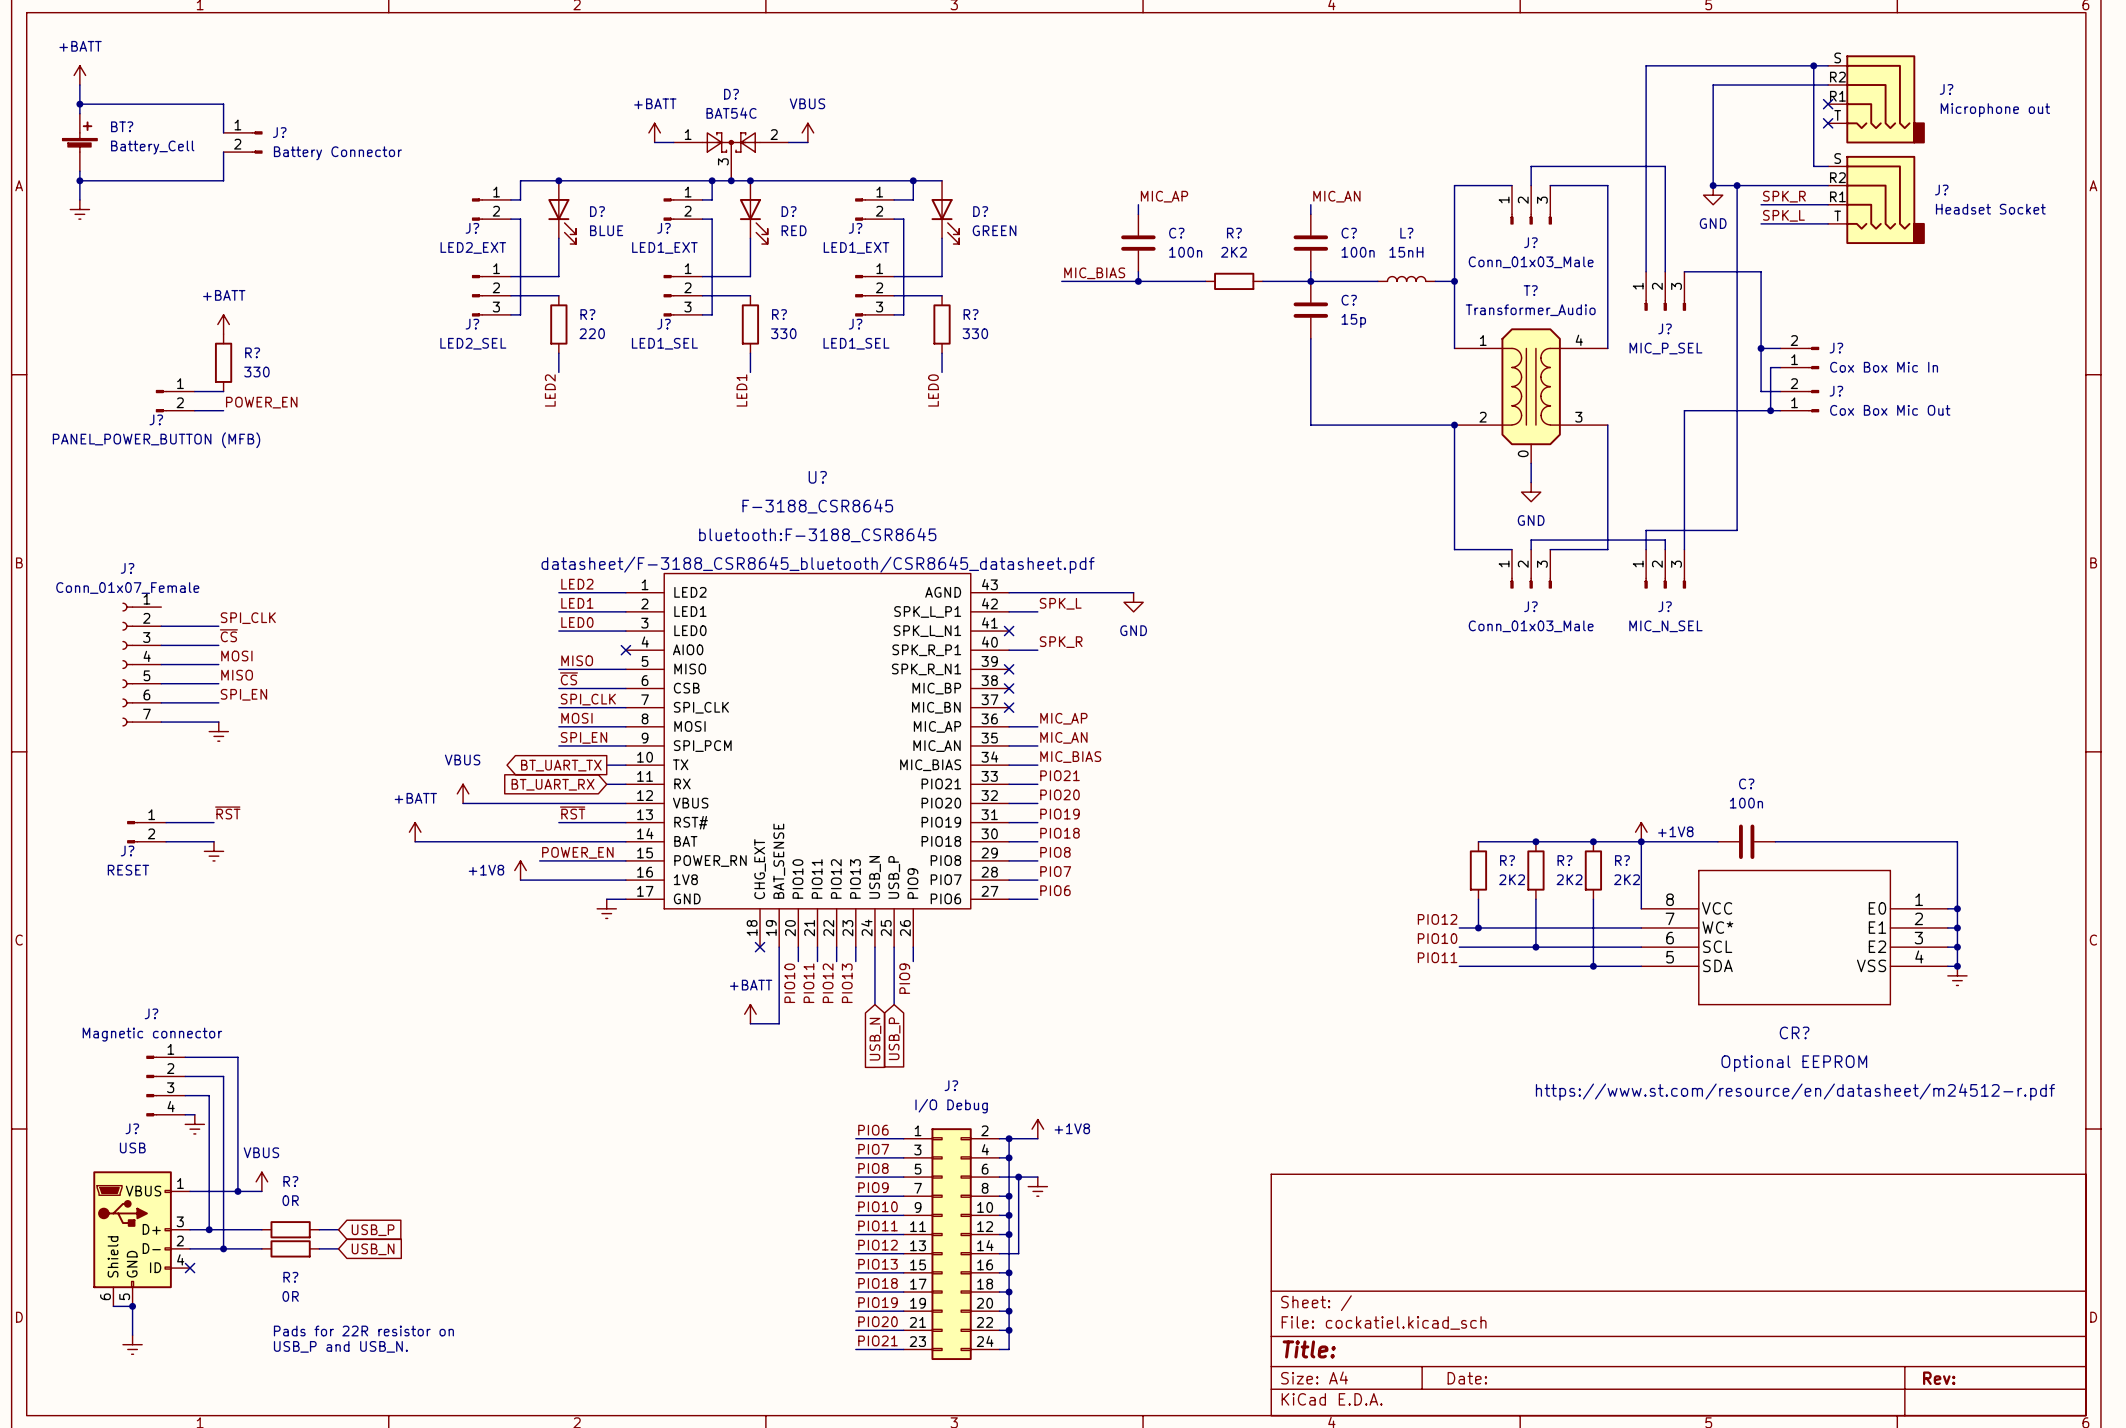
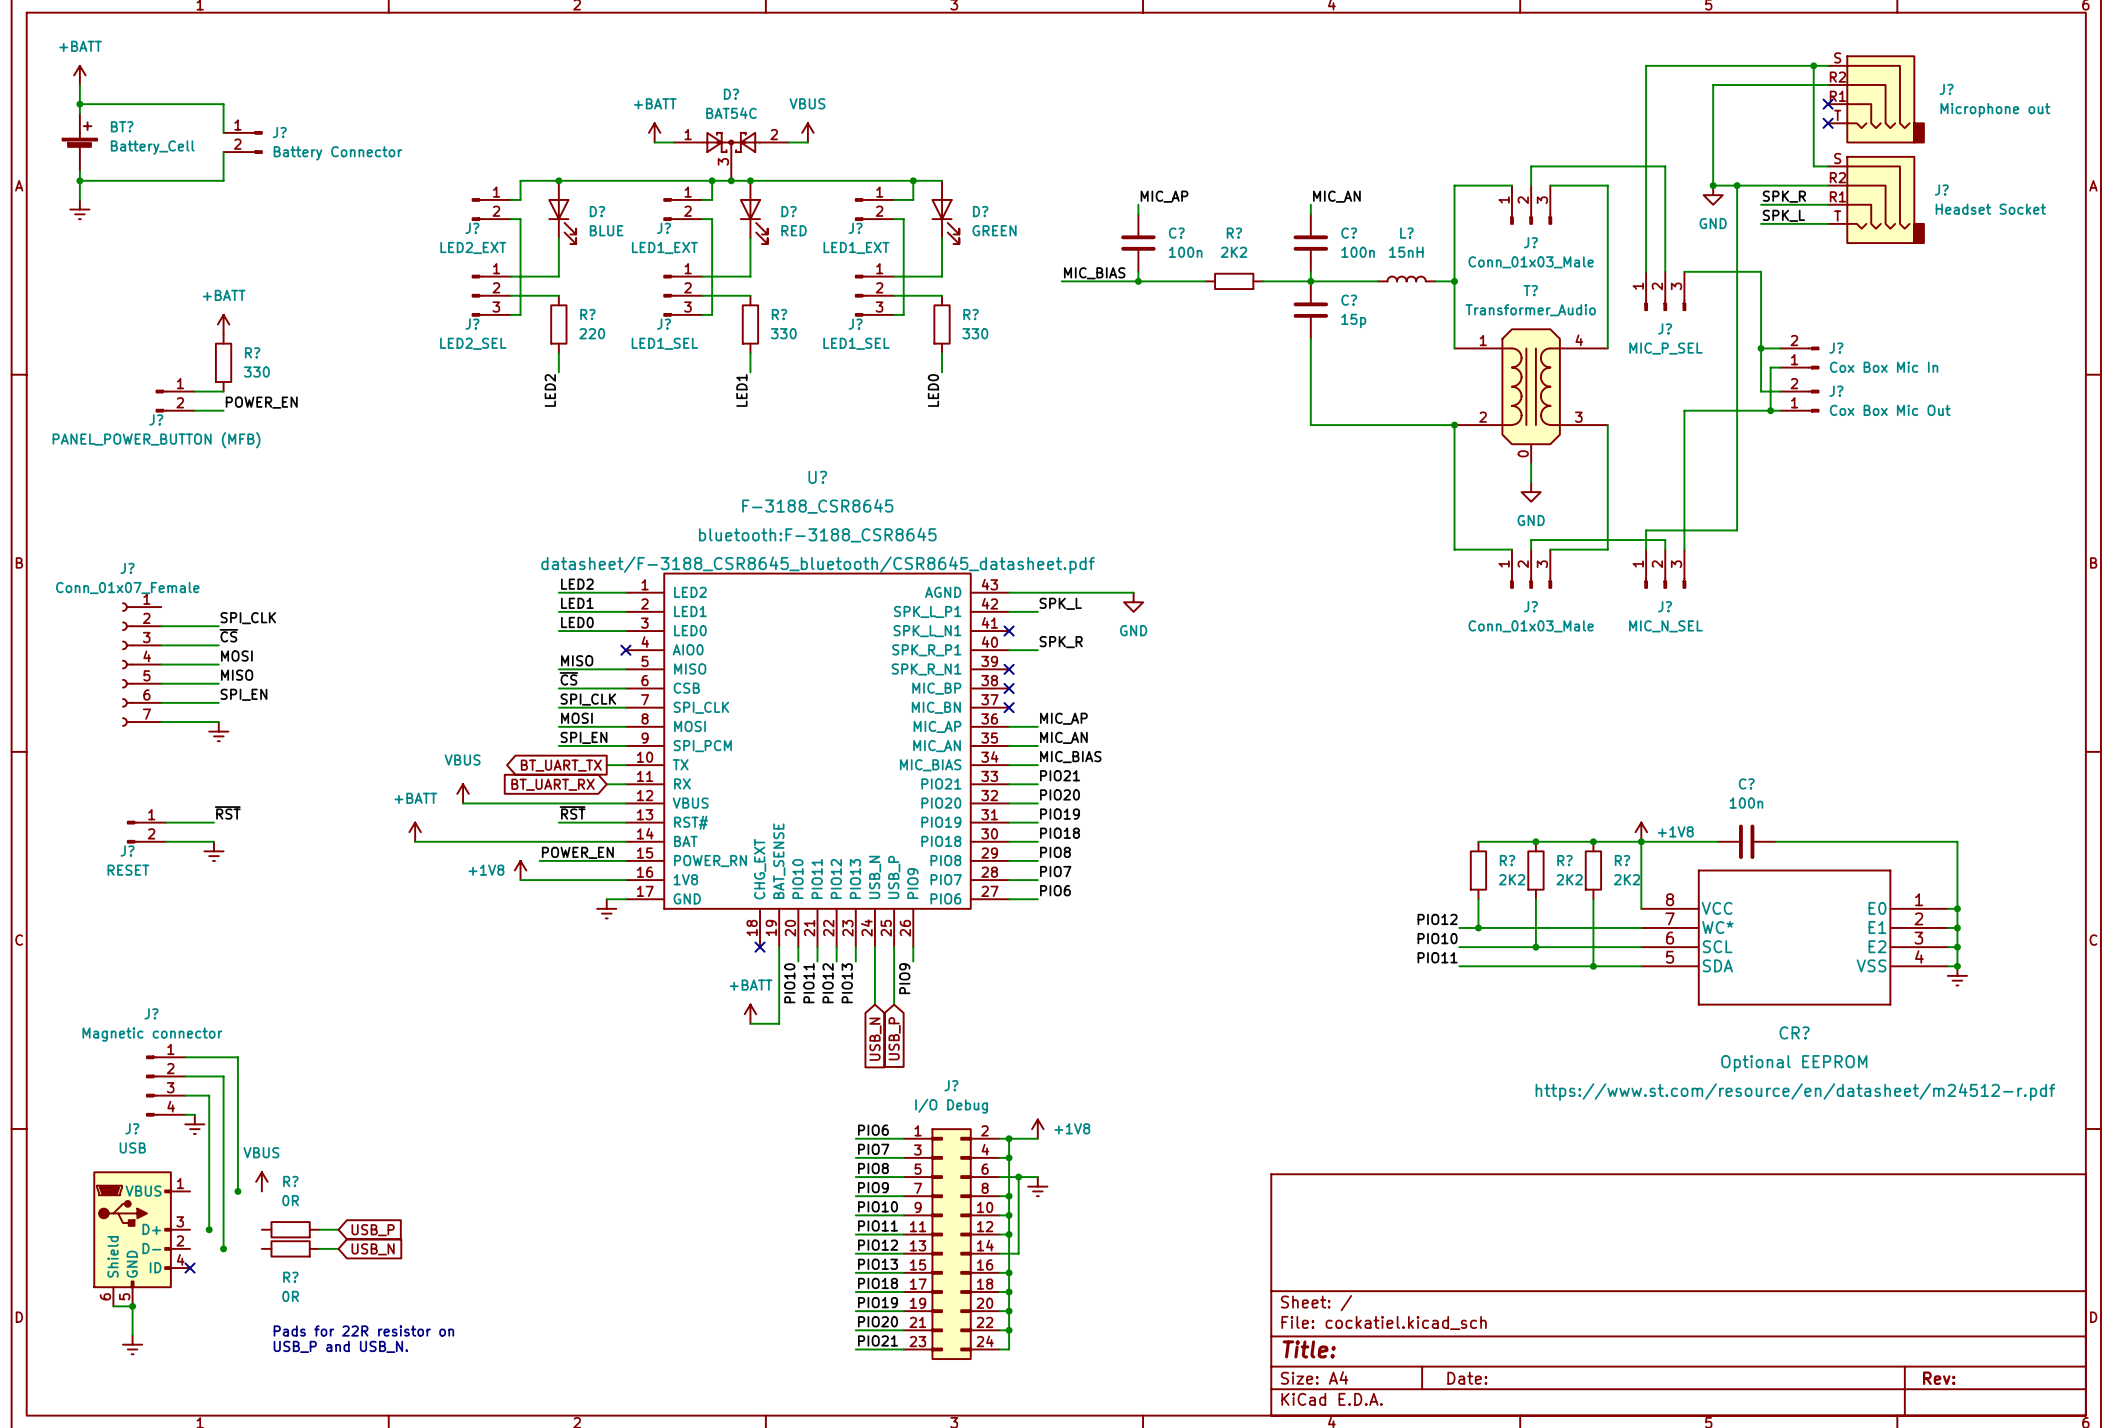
wire: (190, 1191) (261, 1191) -> none
wire: (190, 1229) (261, 1229) -> none
wire: (190, 1248) (261, 1248) -> none

